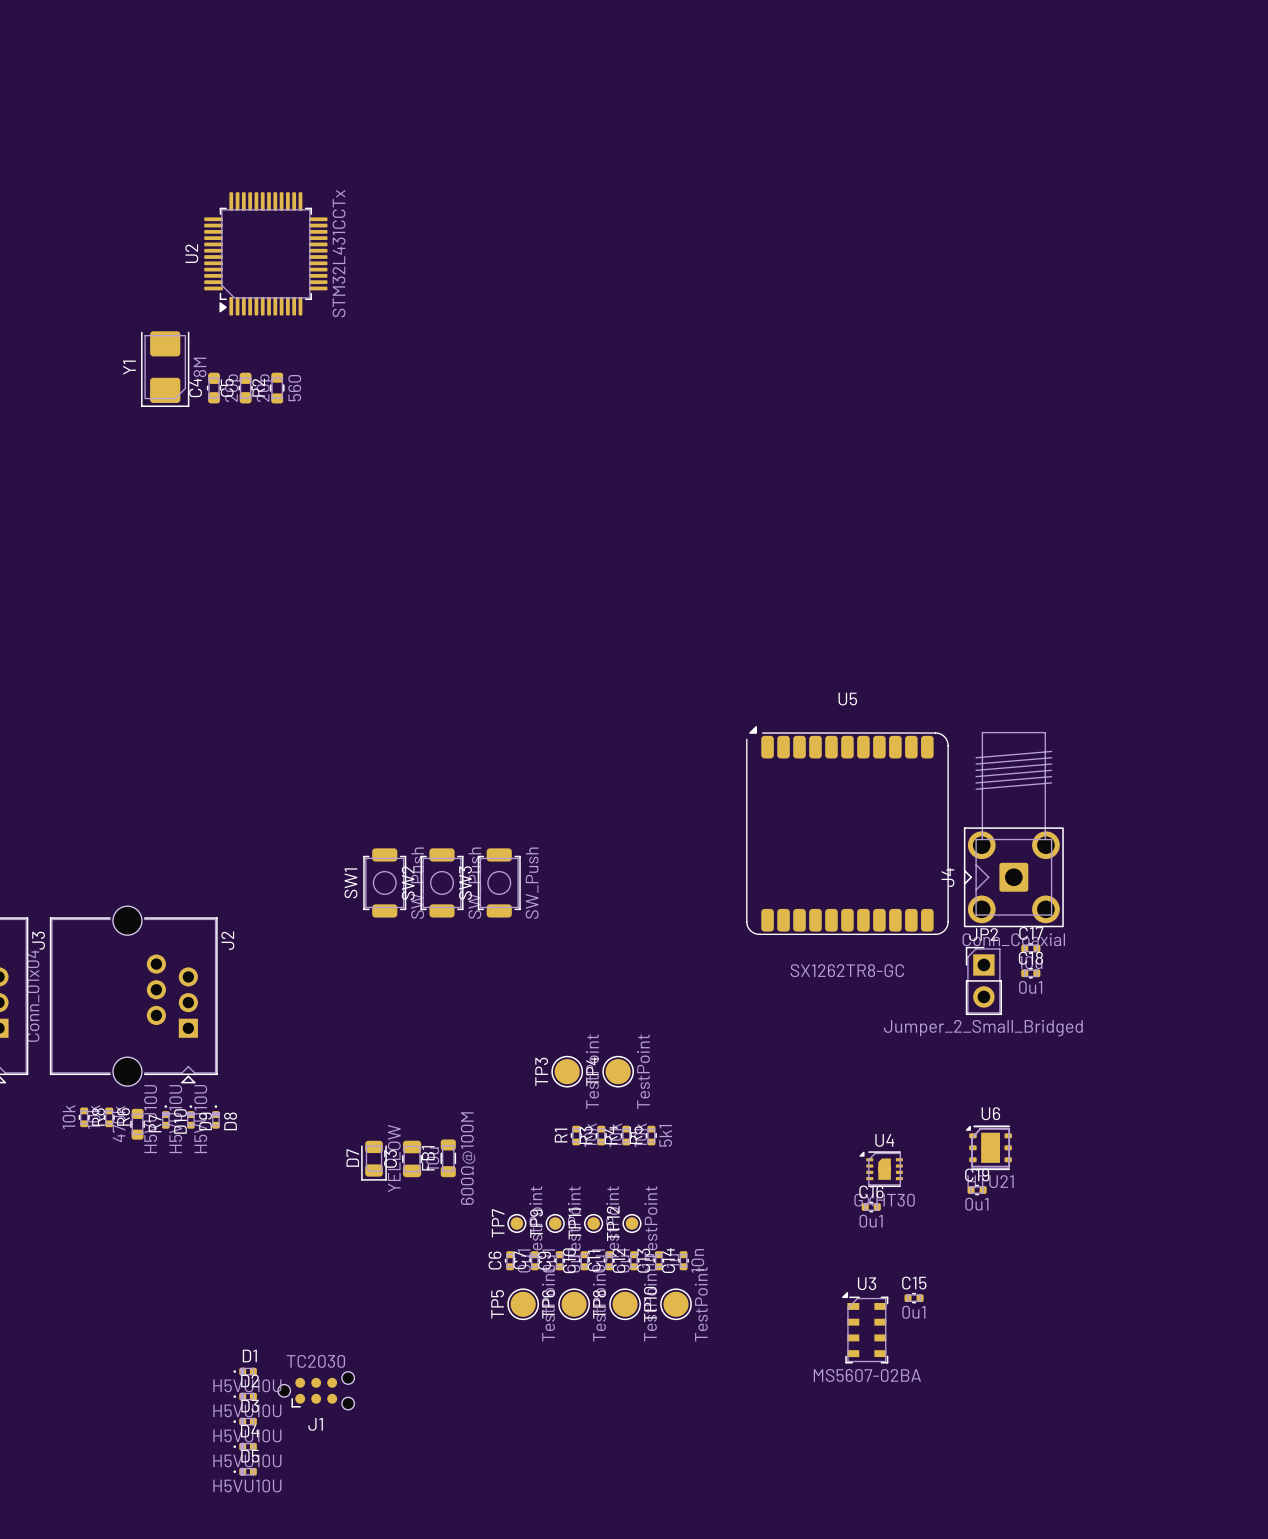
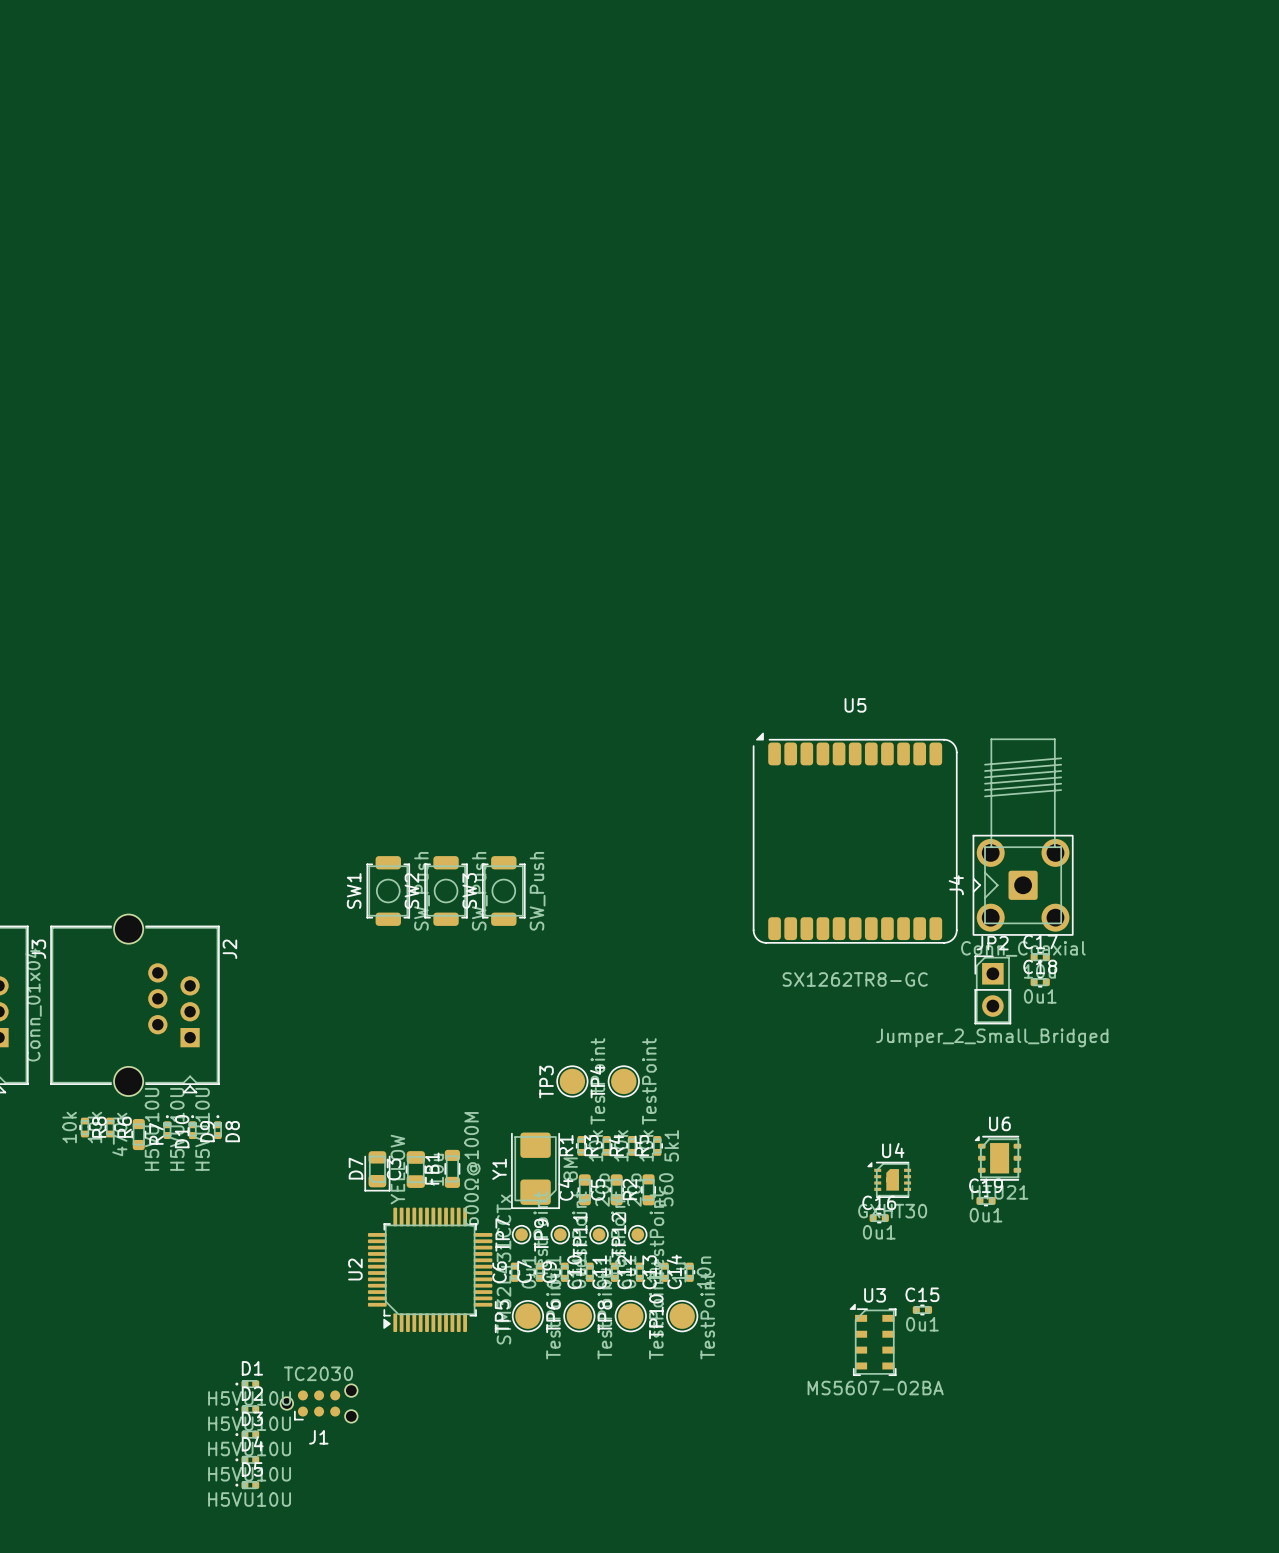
U2 position: (265, 253) -> (430, 1269)
Y1 position: (165, 369) -> (535, 1170)
C4 position: (214, 388) -> (584, 1189)
C5 position: (245, 388) -> (616, 1189)
R2 position: (277, 388) -> (648, 1189)

